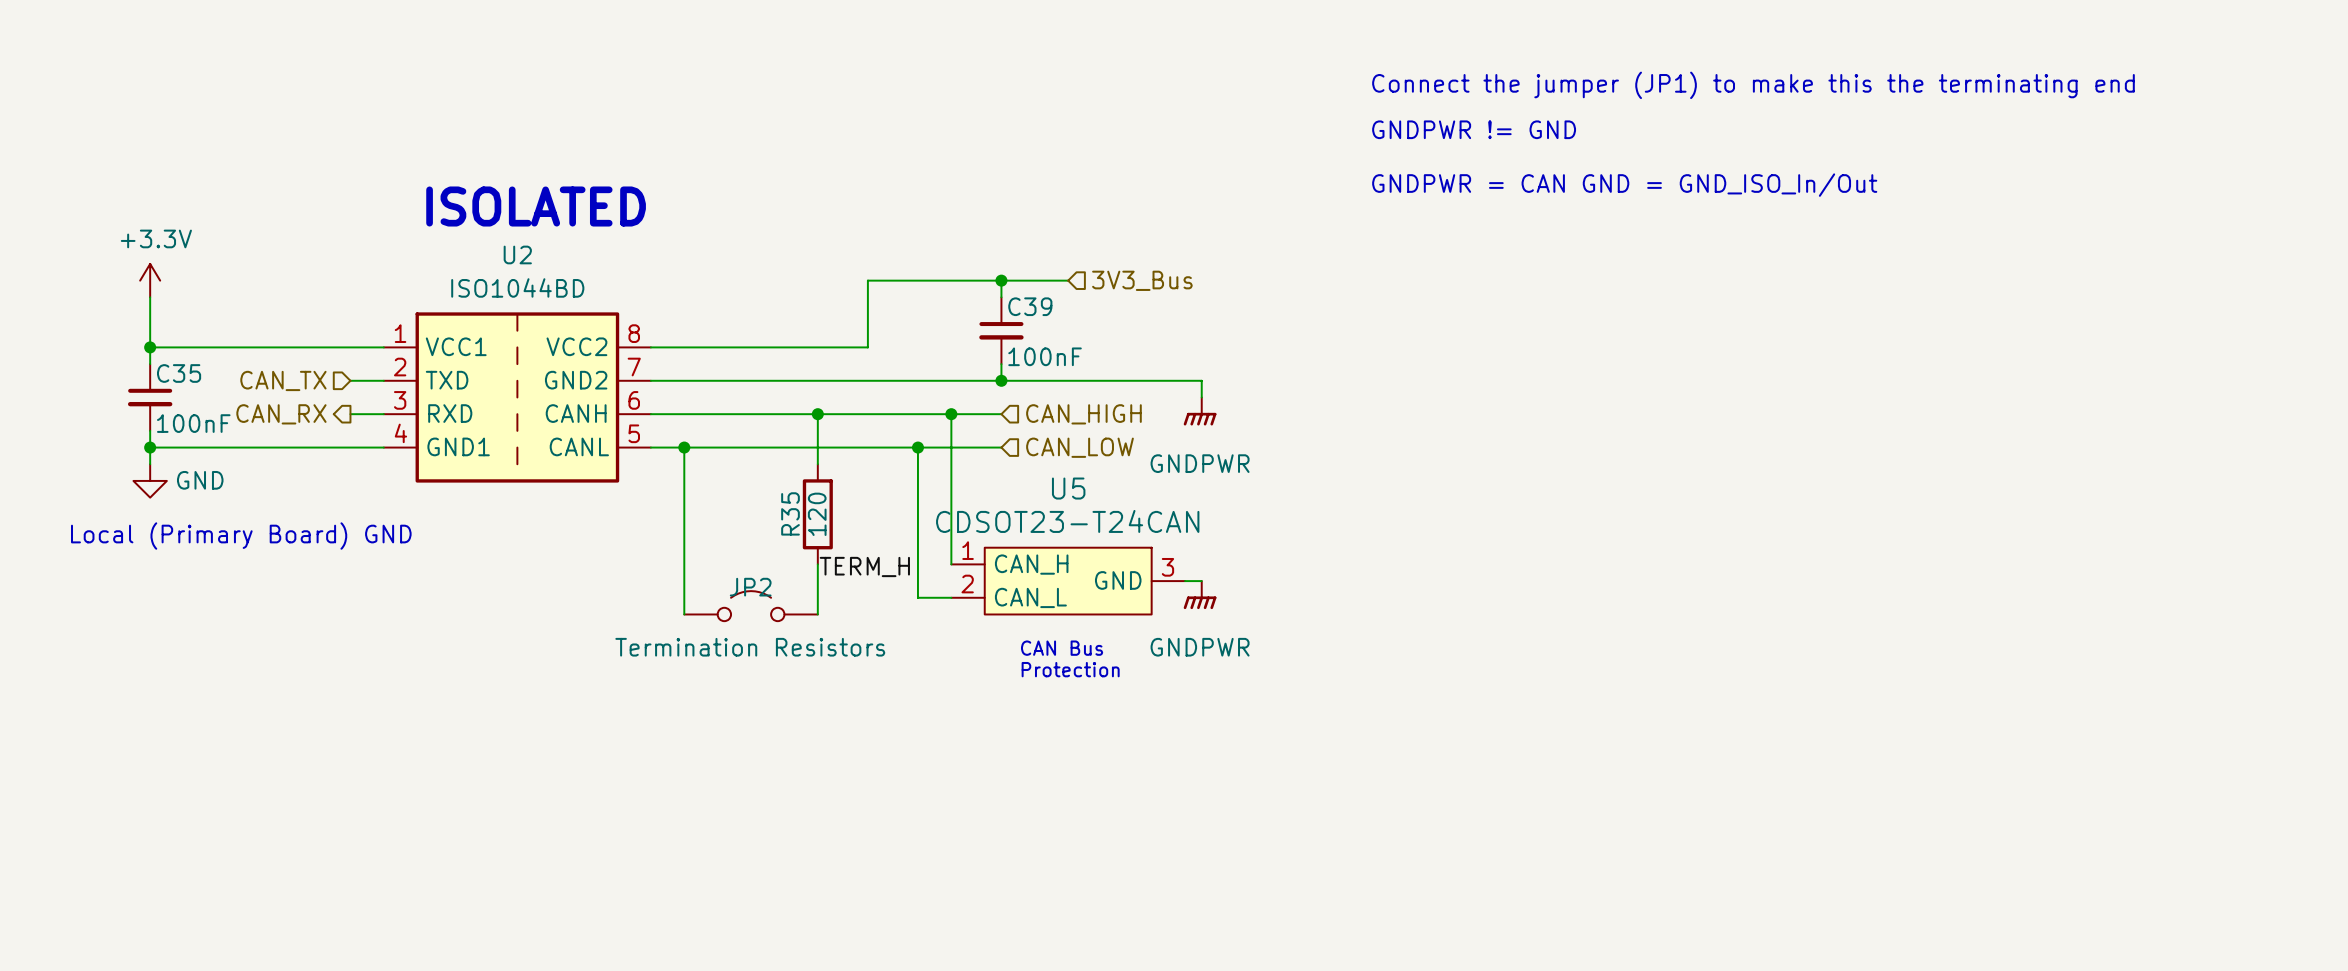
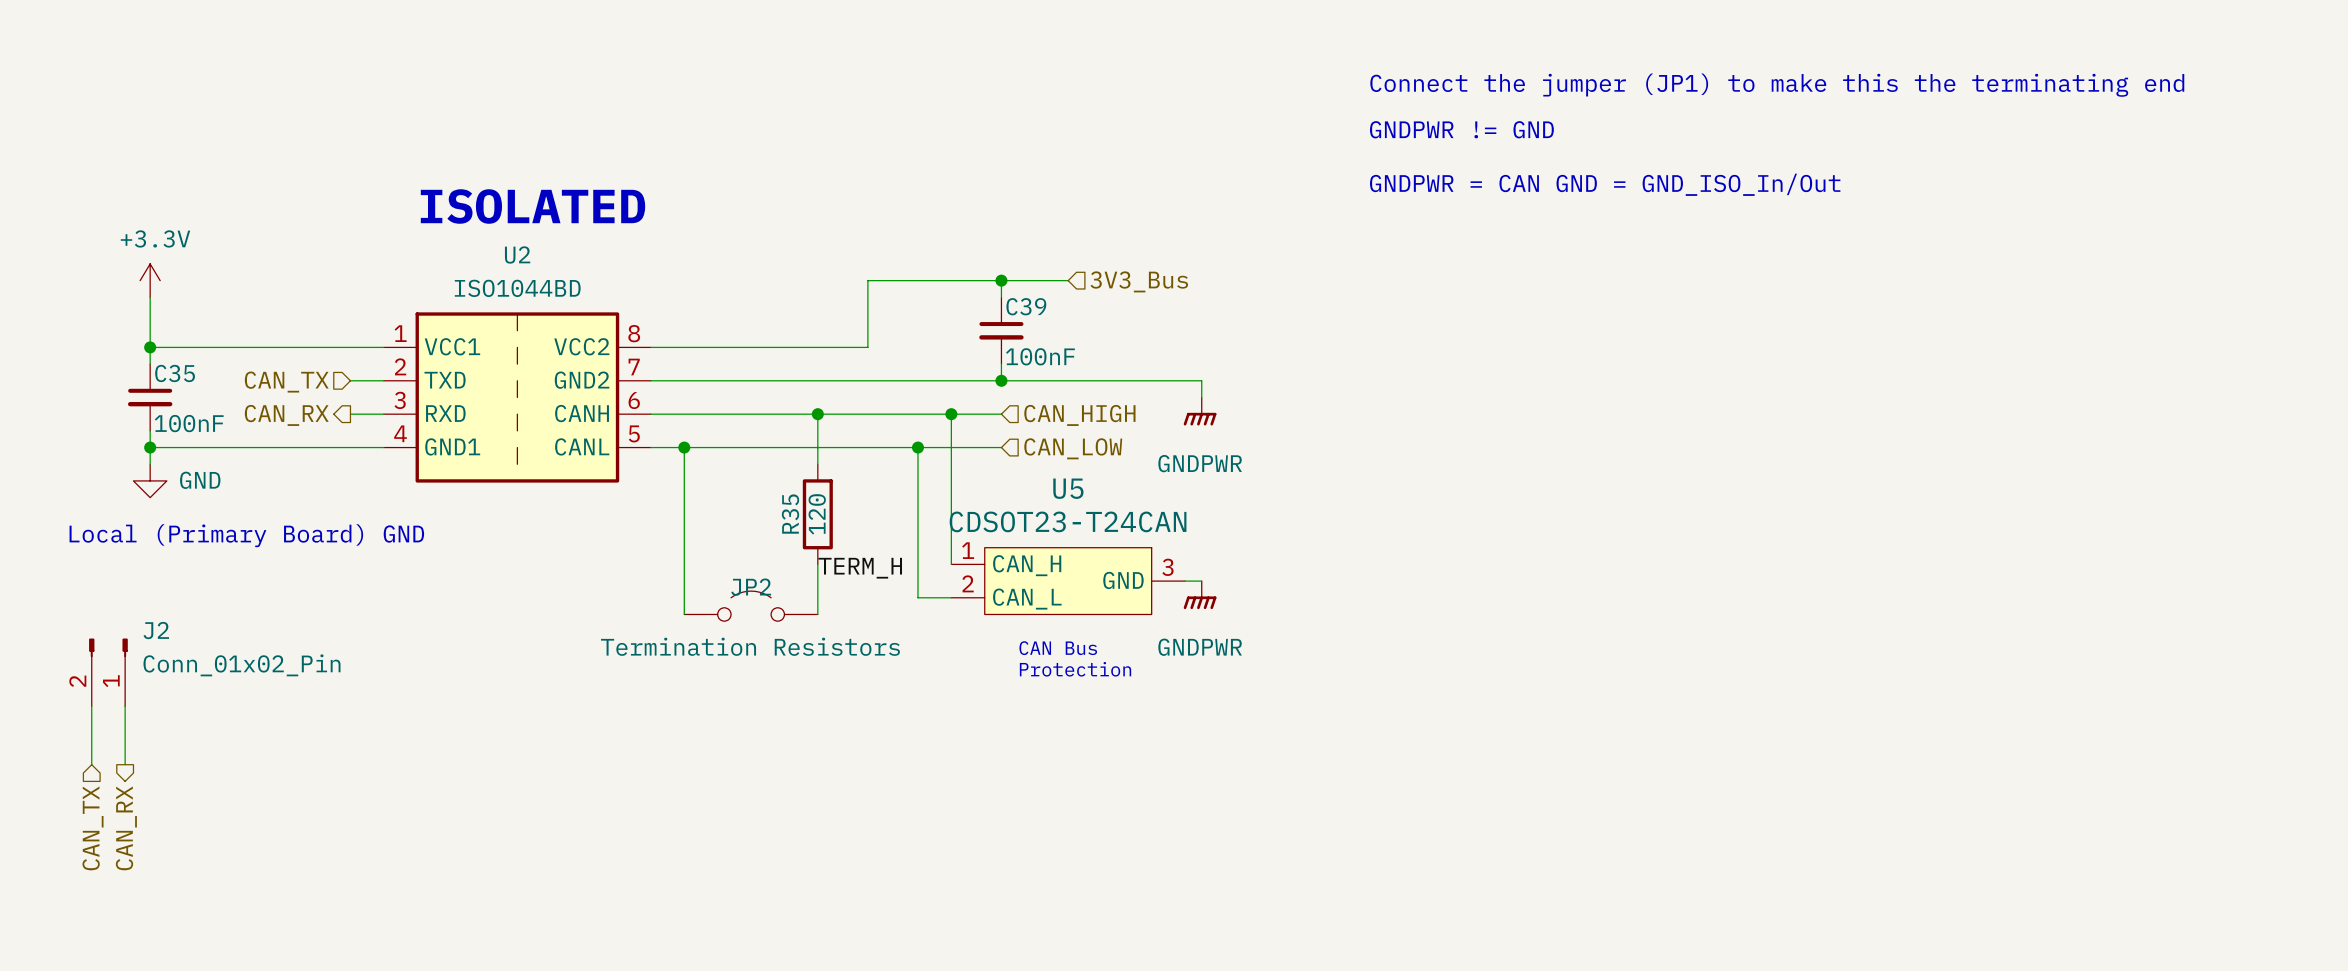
J2: none -> Conn_01x02_Pin (108, 672)
wire: none -> (91, 706) (91, 764)
wire: none -> (125, 706) (125, 764)
hierarchical label: none -> CAN_TX (93, 828)
hierarchical label: none -> CAN_RX (126, 828)

